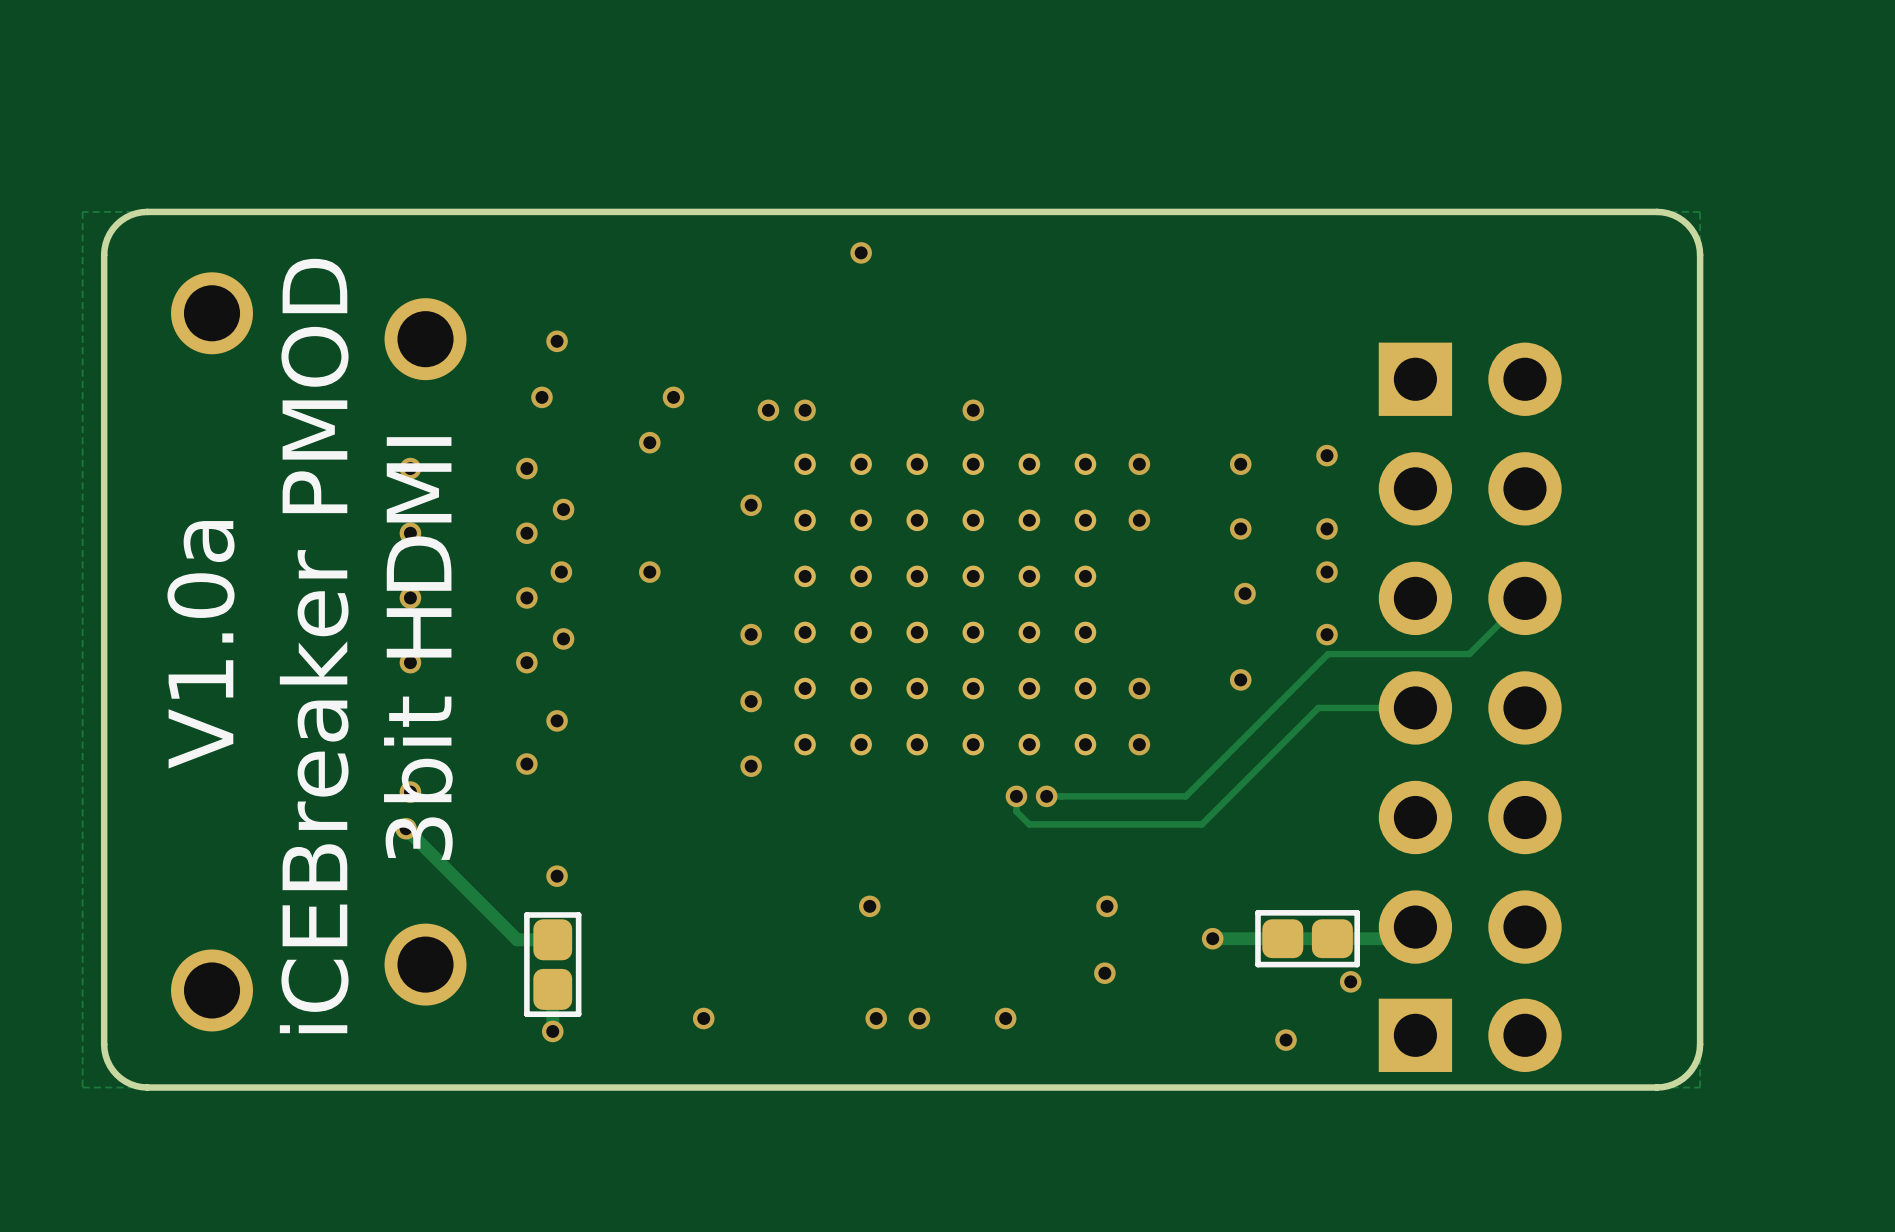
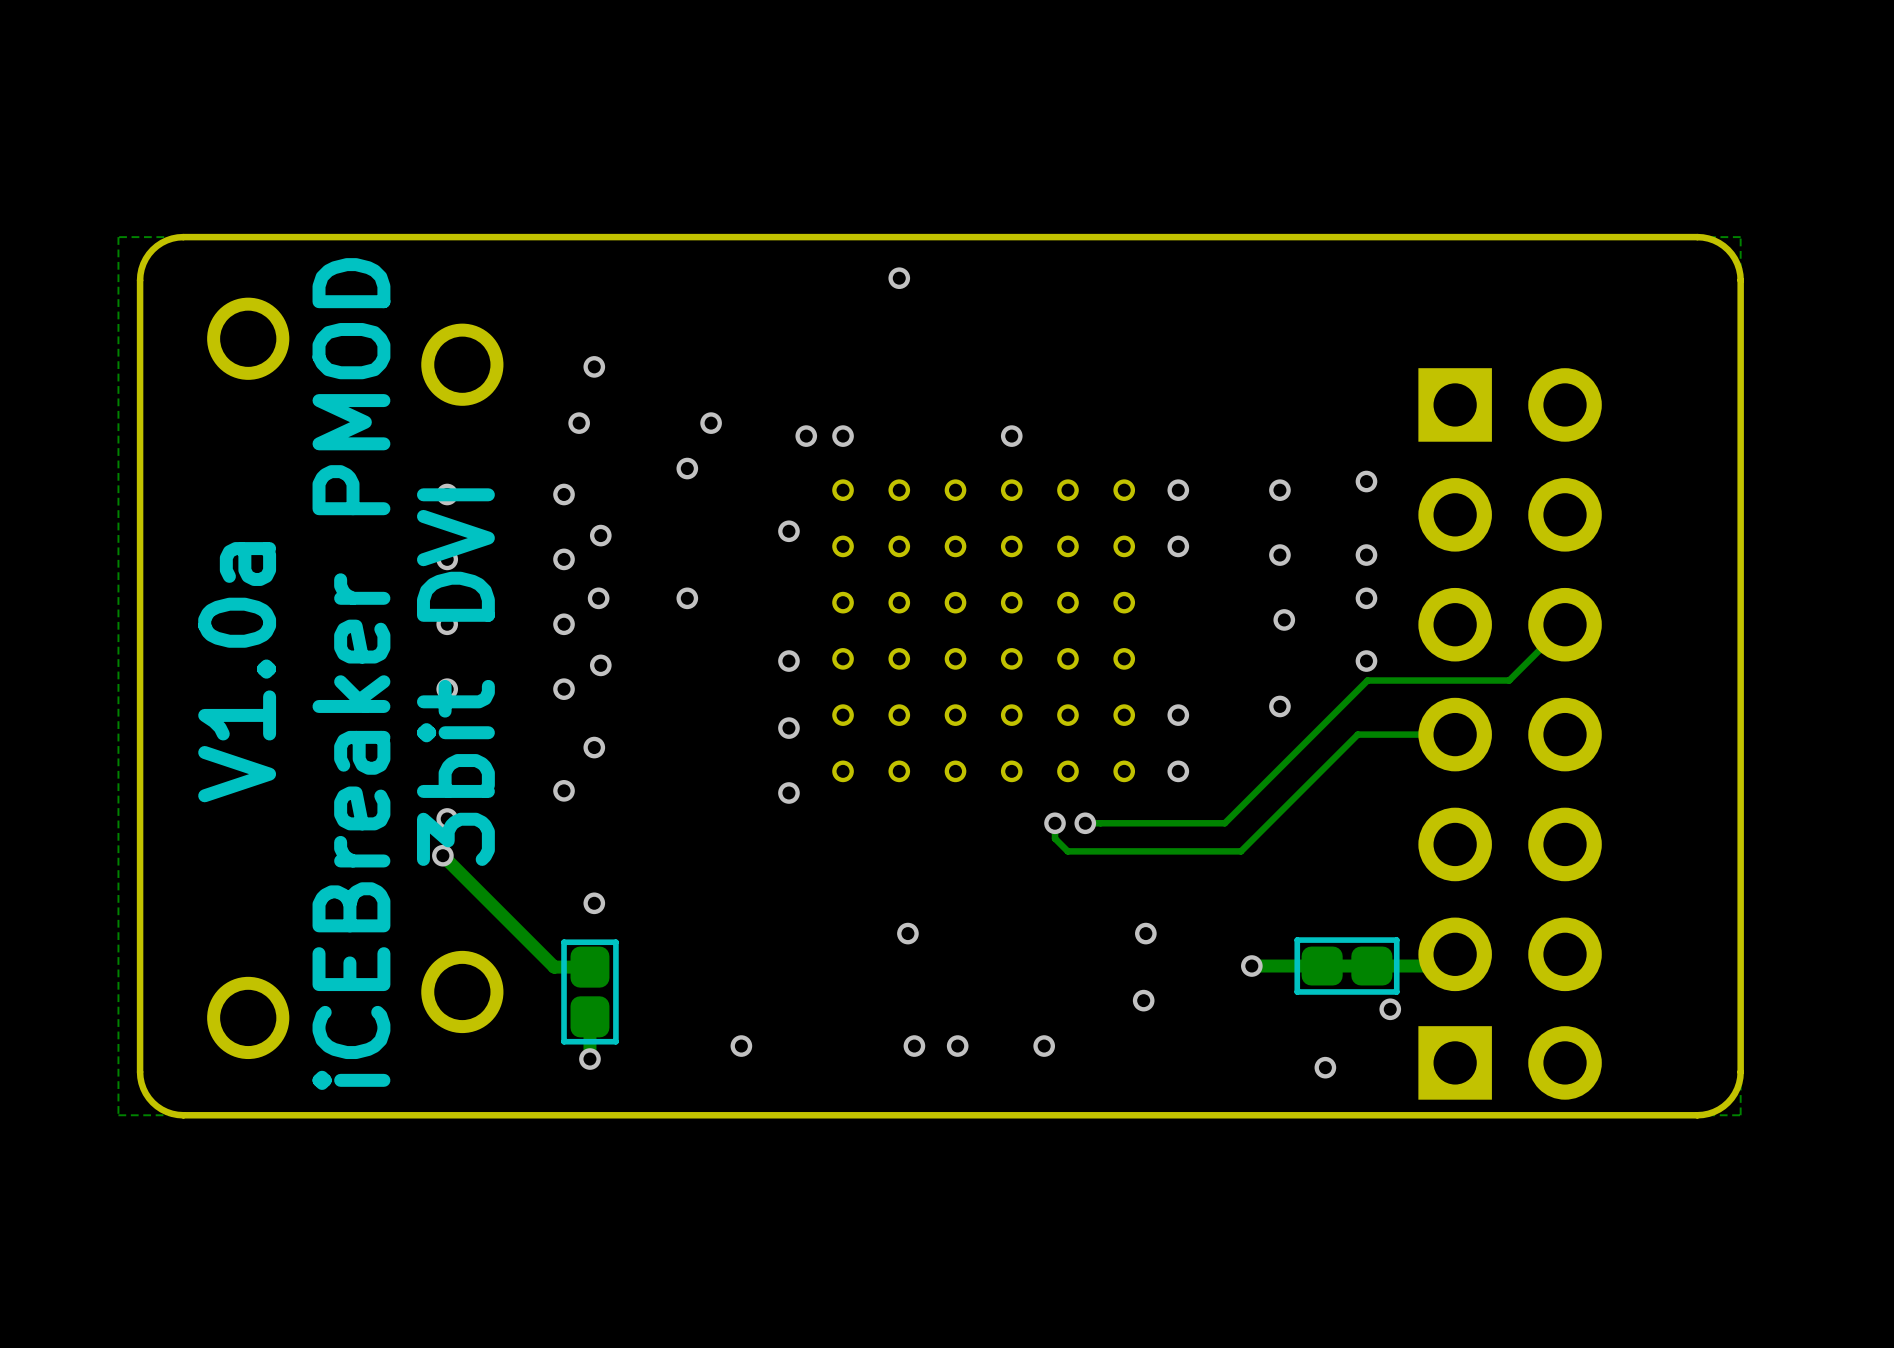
text: 3bit HDMI (418, 648) -> 3bit DVI (455, 677)

